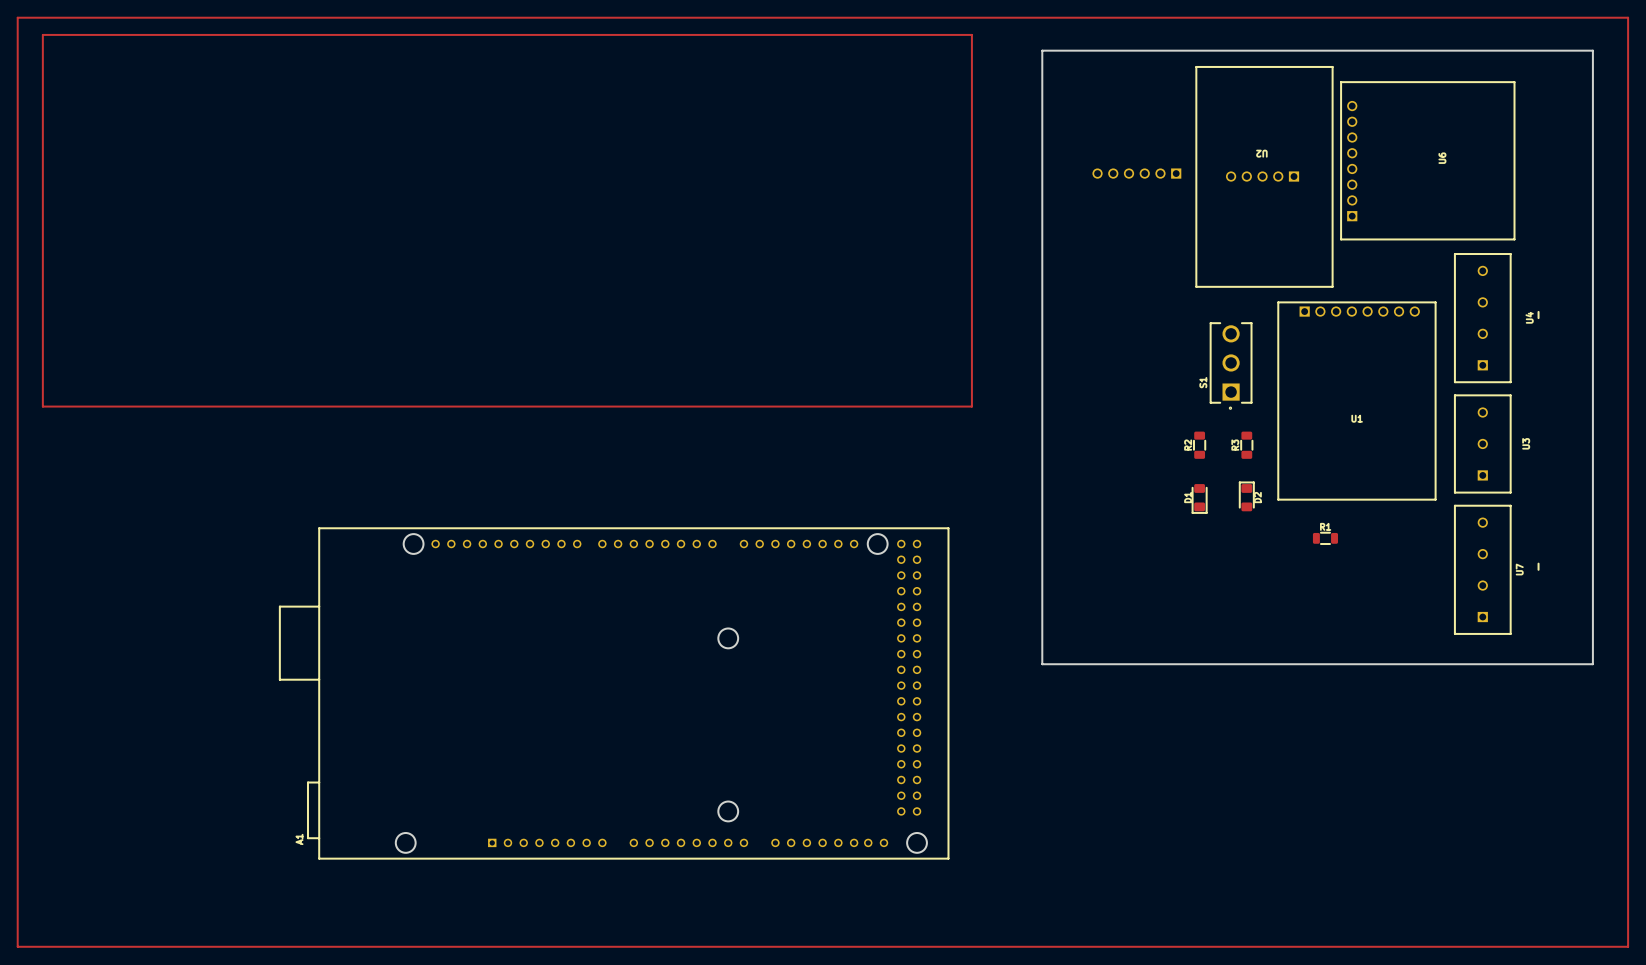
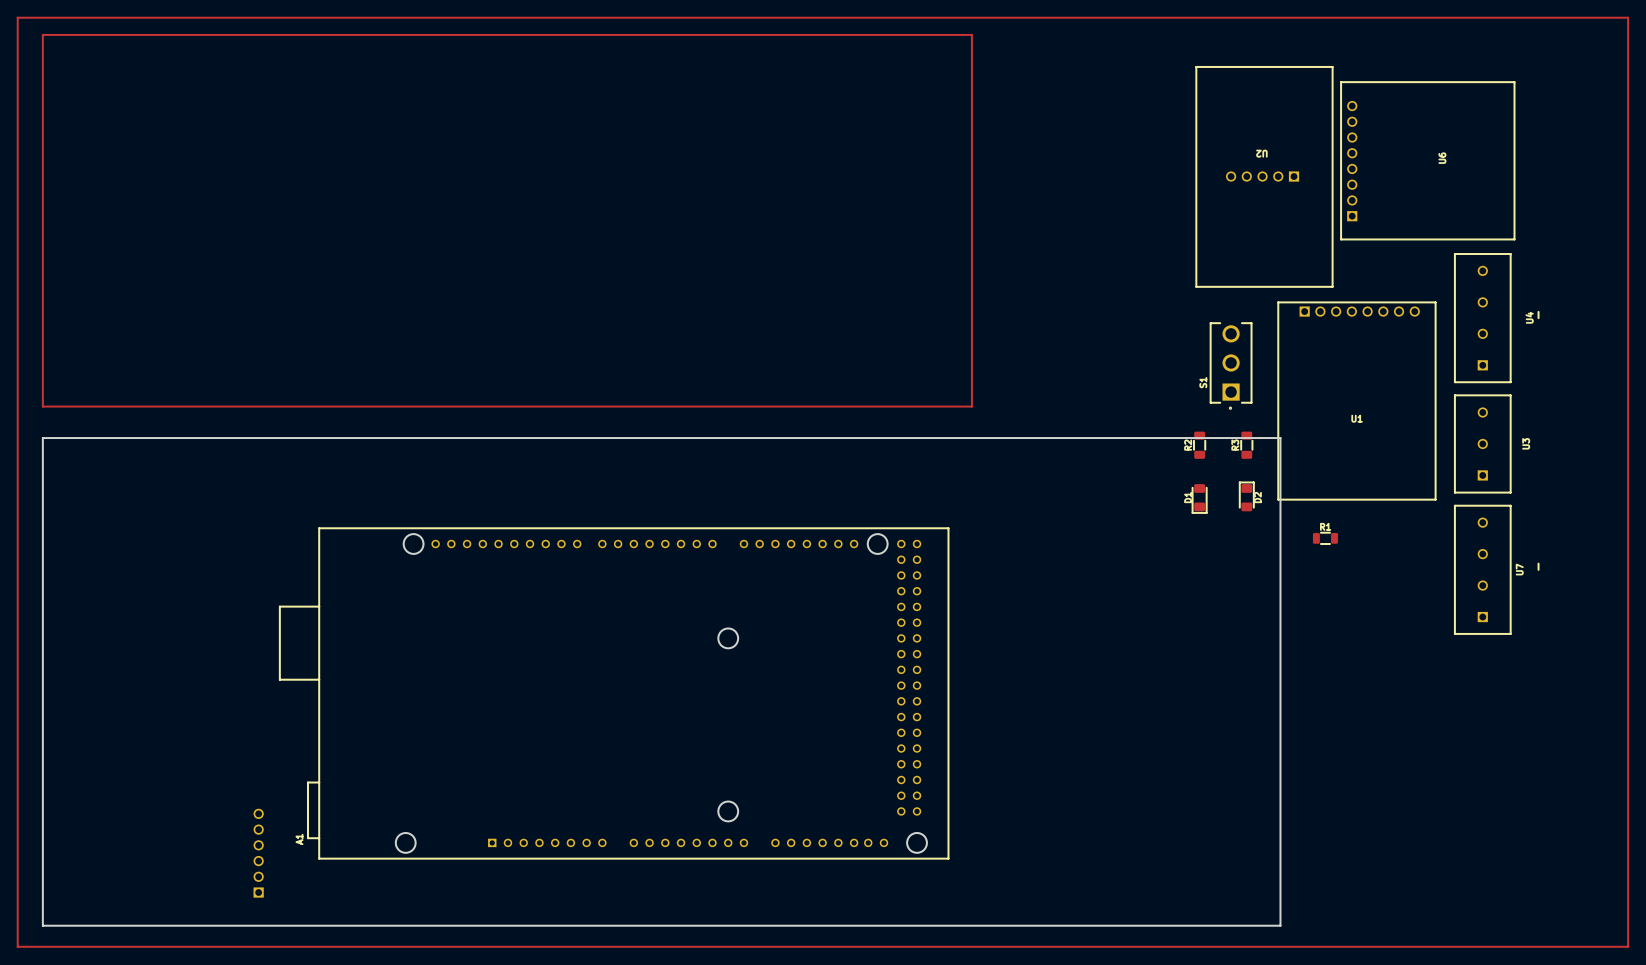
board edge: (1042, 50) (1592, 50) (1592, 664) (1042, 664) (1042, 50) -> none
part: (1136, 173) -> none
board edge: none -> (42, 438) (1280, 438) (1280, 925) (42, 925) (42, 438)
part: none -> (258, 853)

